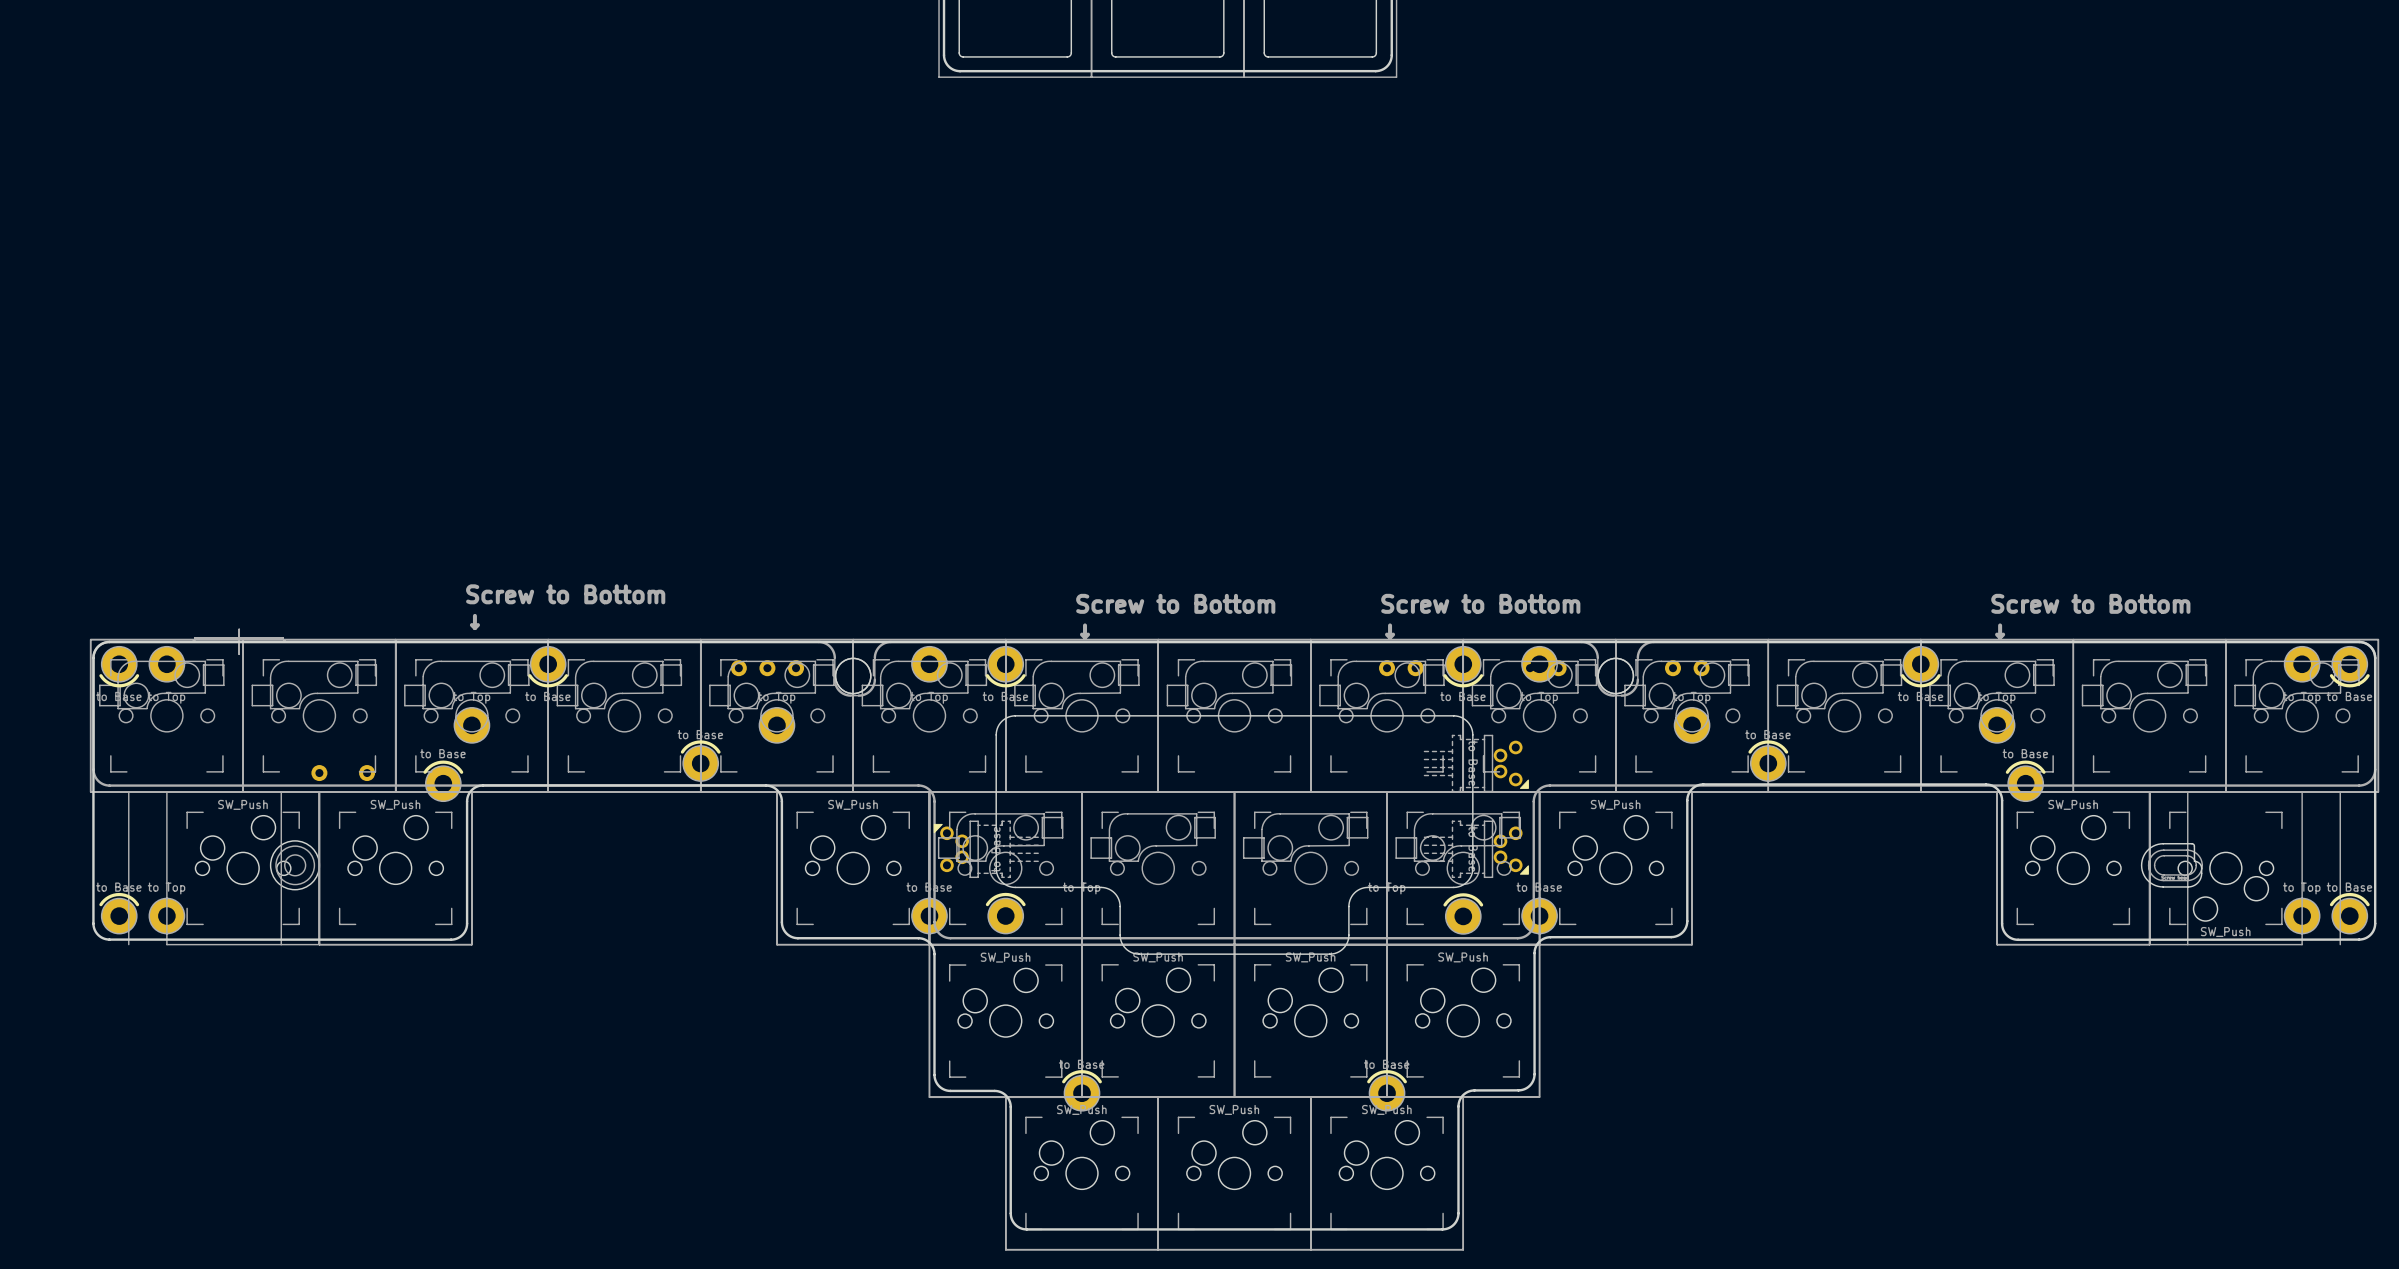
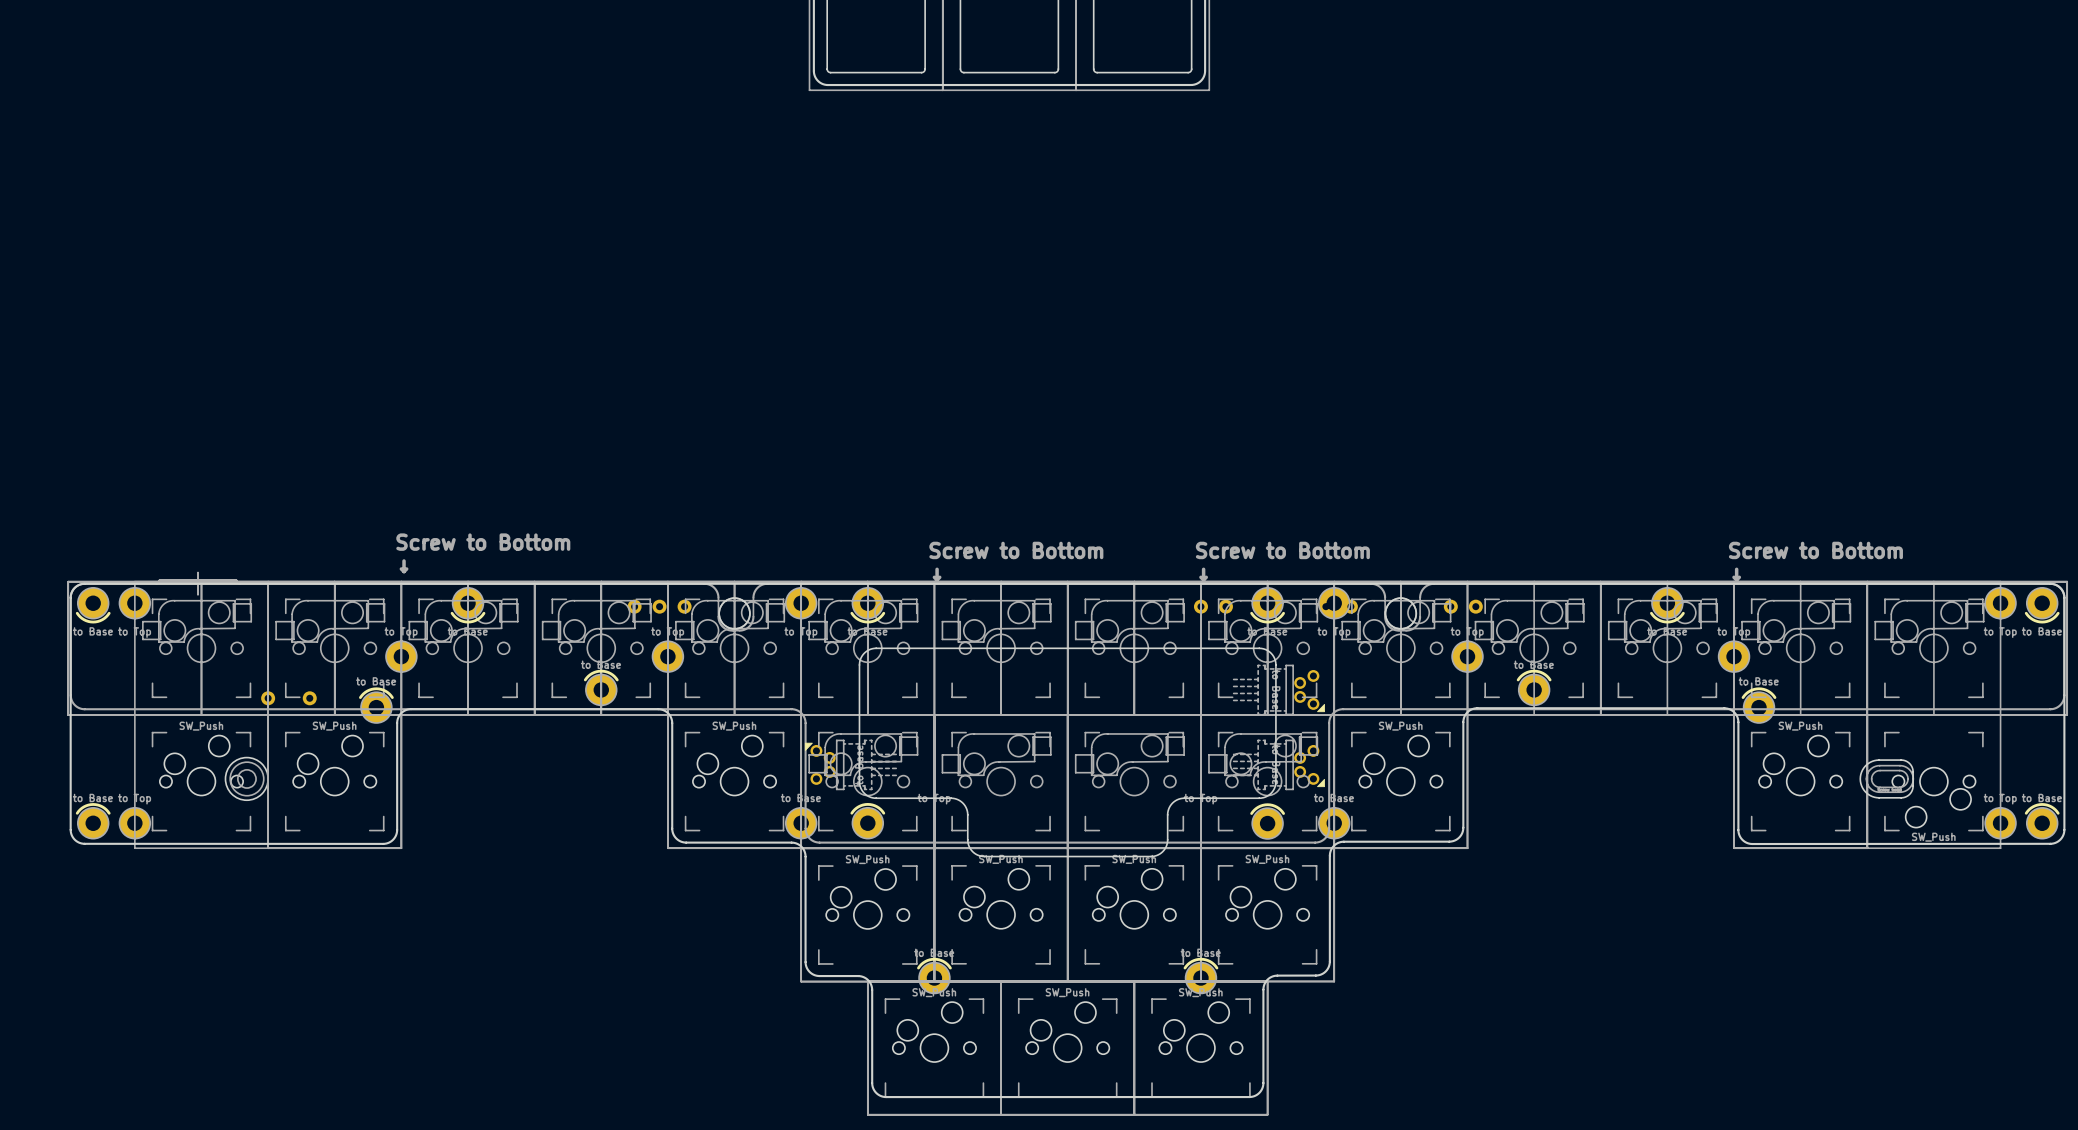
part footprint: [90, 628, 2379, 1251] -> [67, 572, 2068, 1116]

